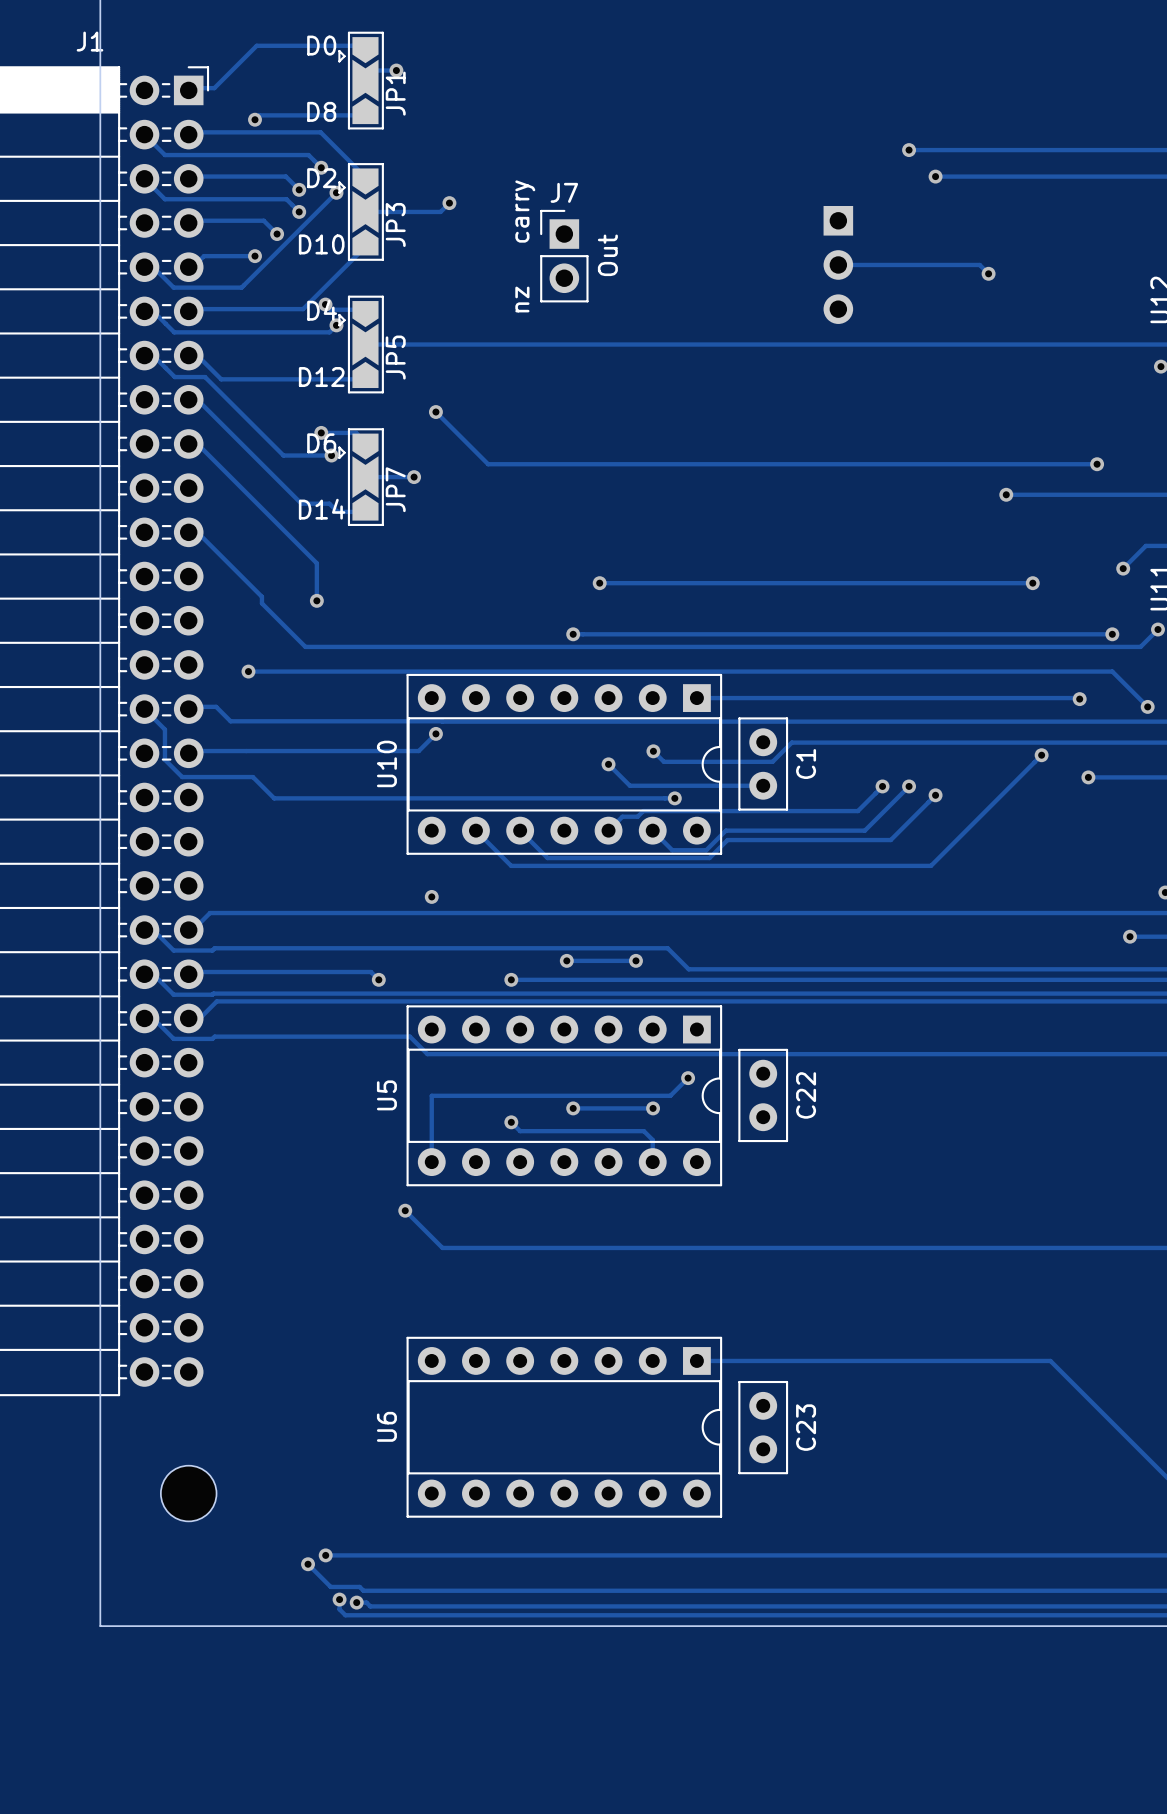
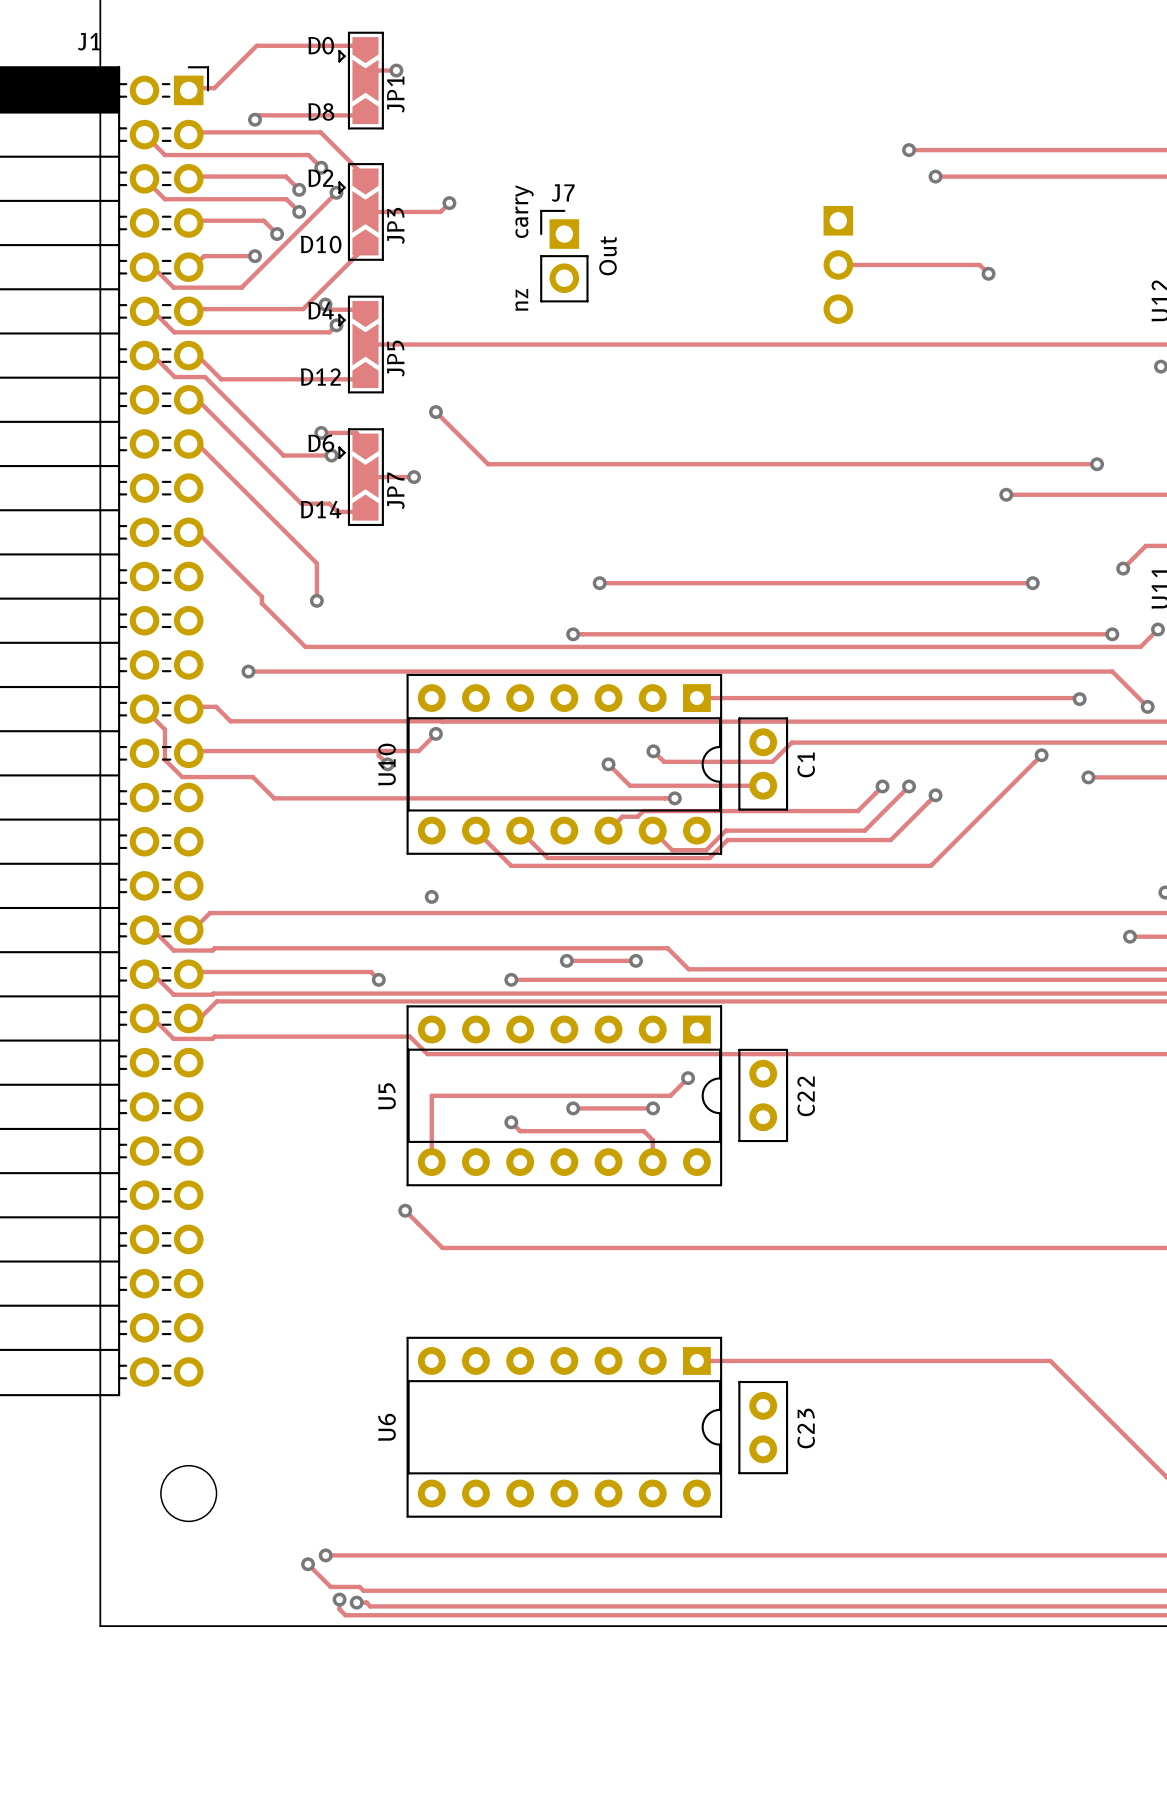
track: none -> (378, 751) (378, 755) (387, 764)
via: none -> (387, 764)

